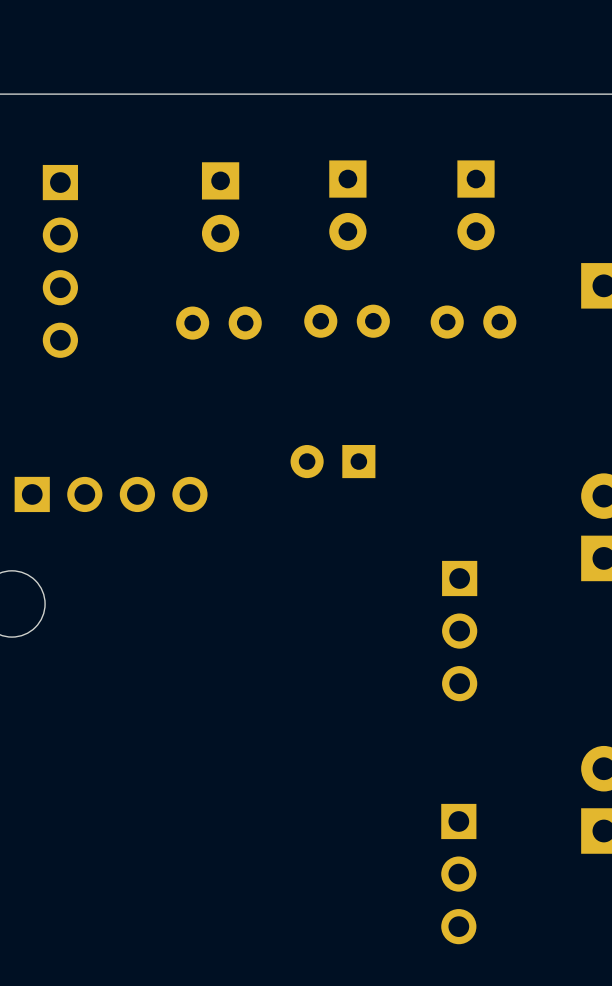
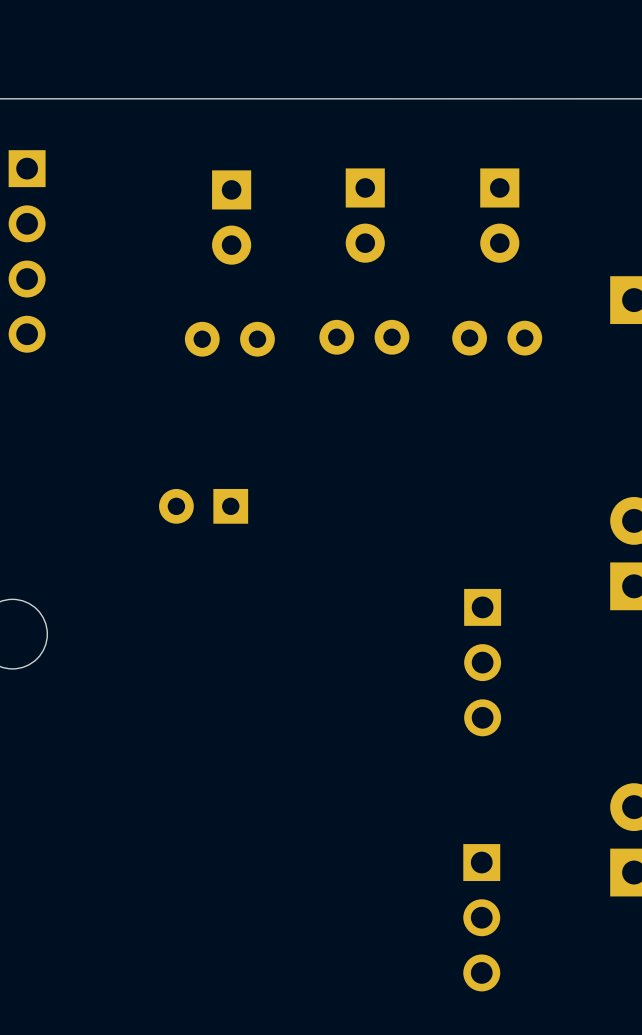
part position: (60, 261) -> (27, 251)
part position: (332, 461) -> (203, 506)
part: (111, 494) -> none

